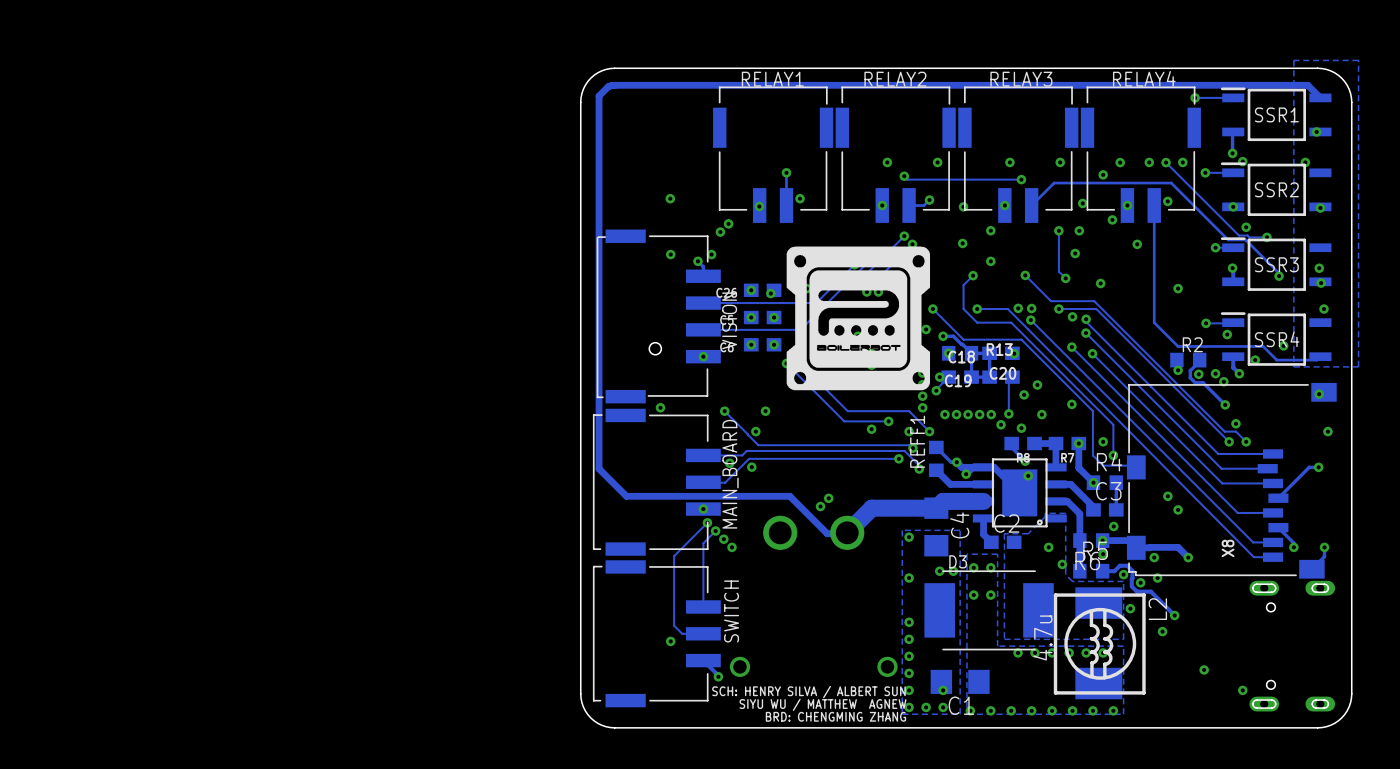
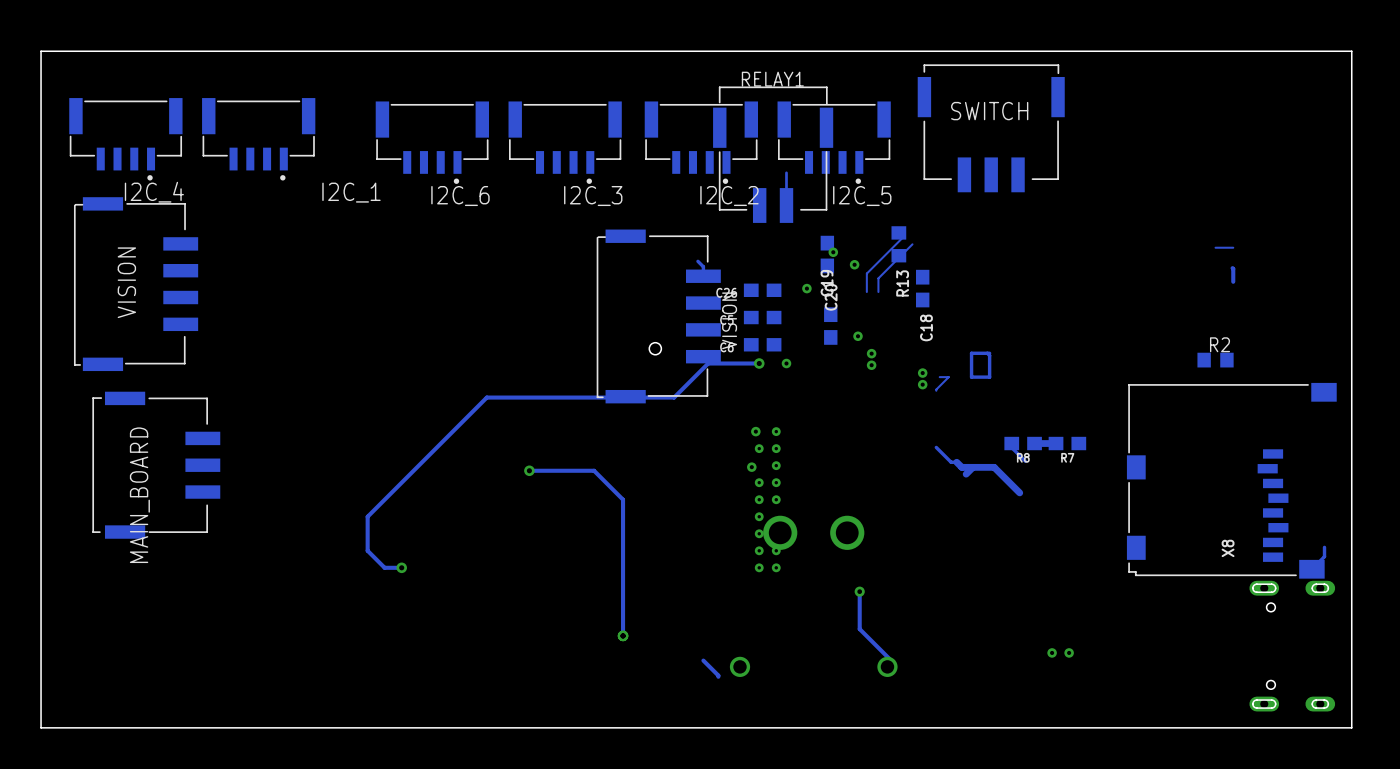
zone outline: (1358, 60) (1358, 366) (1293, 366) (1293, 60) (1358, 60) -> none
via: (1195, 97) -> none
track: (1233, 97) (1195, 97) -> none
track: (1320, 97) (1307, 85) (614, 85) (608, 86) (599, 96) (599, 468) (626, 496) (789, 496) (827, 533) (846, 533) (871, 508) (936, 508) (943, 501) (983, 501) -> none
board edge: (1351, 102) (1349, 89) (1341, 78) (1330, 70) (1317, 68) (614, 68) (605, 69) (594, 75) (583, 89) (580, 102) (580, 693) (583, 706) (590, 717) (601, 725) (614, 727) -> (1351, 102) (1351, 51) (41, 51) (41, 727) (614, 727)
SSR1: (1276, 114) -> none
SWITCH: none -> (991, 128)
track: (1233, 131) (1232, 153) -> none
via: (1316, 131) -> none
I2C_4: none -> (125, 139)
I2C_1: none -> (258, 139)
I2C_6: none -> (432, 142)
I2C_3: none -> (565, 142)
I2C_2: none -> (701, 142)
I2C_5: none -> (834, 142)
via: (1232, 153) -> none
RELAY2: (895, 154) -> none
RELAY3: (1018, 154) -> none
RELAY4: (1140, 154) -> none
via: (1242, 161) -> none
via: (887, 162) -> none
via: (937, 162) -> none
via: (1009, 162) -> none
via: (1060, 162) -> none
via: (1120, 162) -> none
via: (1149, 162) -> none
track: (1166, 162) (1238, 235) (1266, 237) -> none
via: (1166, 162) -> none
via: (1182, 162) -> none
via: (1305, 162) -> none
via: (786, 172) -> none
via: (1205, 172) -> none
track: (1233, 172) (1205, 172) -> none
via: (1103, 174) -> none
track: (904, 176) (907, 179) (1021, 179) -> none
via: (904, 176) -> none
via: (1021, 179) -> none
SSR2: (1276, 189) -> none
via: (670, 198) -> none
via: (800, 198) -> none
track: (929, 200) (924, 205) (909, 205) -> none
via: (929, 200) -> none
via: (1167, 201) -> none
via: (1082, 203) -> none
via: (882, 205) -> none
via: (1004, 205) -> none
track: (1031, 205) (1054, 183) (1171, 183) (1228, 239) (1245, 239) (1279, 273) (1279, 276) -> none
via: (1127, 205) -> none
track: (1154, 205) (1154, 322) (1178, 346) (1263, 346) (1276, 360) (1317, 360) (1320, 356) -> none
via: (759, 206) -> none
via: (963, 206) -> none
via: (1233, 206) -> none
via: (1320, 208) -> none
via: (1112, 219) -> none
via: (728, 223) -> none
via: (1246, 227) -> none
via: (990, 230) -> none
track: (1058, 230) (1058, 271) (1065, 278) -> none
via: (1058, 230) -> none
via: (1079, 230) -> none
via: (720, 232) -> none
via: (904, 236) -> none
via: (1266, 237) -> none
via: (962, 243) -> none
via: (912, 244) -> none
via: (1137, 244) -> none
drawing: [786, 246, 931, 391] -> none
via: (1215, 247) -> none
via: (1075, 253) -> none
via: (670, 254) -> none
via: (711, 254) -> none
track: (871, 256) (871, 258) (800, 329) (703, 329) -> none
via: (697, 261) -> none
via: (990, 261) -> none
track: (854, 264) (816, 303) (703, 303) -> none
SSR3: (1276, 264) -> none
via: (1232, 268) -> none
via: (1319, 268) -> none
track: (973, 275) (963, 285) (963, 309) (977, 322) (1011, 322) (1113, 424) (1113, 455) -> none
via: (973, 275) -> none
track: (1025, 275) (1051, 301) (1094, 301) (1224, 431) (1235, 431) (1246, 441) -> none
via: (1025, 275) -> none
via: (1279, 276) -> none
via: (1065, 278) -> none
via: (1100, 283) -> none
via: (1321, 283) -> none
VISION: none -> (136, 284)
via: (1178, 288) -> none
via: (751, 290) -> none
via: (866, 291) -> none
via: (878, 291) -> none
via: (770, 293) -> none
via: (1018, 308) -> none
via: (1031, 308) -> none
track: (932, 309) (963, 339) (1021, 339) (1092, 411) (1092, 455) (1103, 465) (1134, 465) (1136, 467) -> none
via: (932, 309) -> none
track: (977, 309) (1007, 309) (1253, 557) (1273, 557) -> none
via: (977, 309) -> none
track: (1058, 309) (1096, 309) (1229, 441) -> none
via: (1058, 309) -> none
via: (1323, 309) -> none
via: (1072, 316) -> none
via: (751, 317) -> none
via: (774, 317) -> none
track: (1086, 319) (1086, 321) (1218, 453) (1273, 453) -> none
via: (1086, 319) -> none
track: (1030, 320) (1253, 542) (1273, 542) -> none
via: (1030, 320) -> none
track: (1233, 322) (1206, 323) -> none
via: (1206, 323) -> none
via: (926, 329) -> none
track: (1085, 333) (1221, 468) (1267, 468) -> none
via: (1085, 333) -> none
via: (1227, 334) -> none
track: (943, 336) (953, 336) (971, 353) -> none
via: (943, 336) -> none
SSR4: (1276, 339) -> none
via: (751, 344) -> none
via: (774, 344) -> none
via: (1283, 345) -> none
track: (1071, 347) (1237, 512) (1273, 512) -> none
via: (1071, 347) -> none
via: (948, 353) -> none
R13 rotation: 0° (960, 353) -> 90° clockwise (898, 244)
R13 position: (960, 353) -> (898, 244)
C18 rotation: 0° (1001, 353) -> 90° clockwise (922, 288)
C18 position: (1001, 353) -> (922, 288)
via: (1014, 353) -> none
track: (1092, 353) (1222, 483) (1273, 483) -> none
via: (1092, 353) -> none
via: (703, 356) -> none
track: (1233, 356) (1233, 367) (1239, 373) -> none
C18 name position: C18 (961, 357) -> C18 (926, 327)
R2 position: (1188, 360) -> (1215, 360)
track: (1199, 360) (1190, 370) (1190, 377) (1195, 382) (1203, 382) (1225, 404) -> none
via: (1255, 360) -> none
track: none -> (759, 363) (708, 363) (674, 397) (486, 397) (367, 516) (367, 550) (384, 567) (401, 567)
via: none -> (759, 363)
track: (786, 363) (844, 421) (888, 421) -> none
track: (800, 363) (847, 411) (909, 411) (929, 431) -> none
via: (1178, 370) -> none
via: (1215, 373) -> none
via: (1239, 373) -> none
via: (1198, 374) -> none
via: (939, 377) -> none
C20 rotation: 0° (960, 377) -> 90° clockwise (827, 254)
C20 position: (960, 377) -> (827, 254)
C19 rotation: 0° (1001, 377) -> 90° clockwise (830, 326)
C19 position: (1001, 377) -> (830, 326)
track: (1012, 377) (1008, 380) (1008, 413) -> none
via: (1223, 381) -> none
via: (1037, 385) -> none
via: (936, 390) -> none
via: (1024, 394) -> none
via: (1319, 394) -> none
via: (922, 396) -> none
via: (1071, 404) -> none
via: (1225, 404) -> none
via: (660, 407) -> none
via: (922, 407) -> none
track: (724, 411) (758, 445) (909, 445) (912, 448) -> none
via: (724, 411) -> none
via: (765, 411) -> none
via: (1008, 413) -> none
via: (944, 414) -> none
via: (956, 414) -> none
via: (968, 414) -> none
via: (979, 414) -> none
via: (991, 414) -> none
via: (1041, 414) -> none
via: (888, 421) -> none
via: (1235, 423) -> none
via: (1001, 424) -> none
via: (1021, 428) -> none
via: (871, 429) -> none
via: none -> (776, 431)
via: (909, 431) -> none
via: (929, 431) -> none
via: (1327, 431) -> none
via: (1103, 441) -> none
via: (1229, 441) -> none
via: (1246, 441) -> none
track: (1055, 443) (1055, 467) -> none
track: (1078, 443) (1078, 468) (1093, 482) -> none
via: (1078, 443) -> none
via: none -> (759, 448)
via: none -> (776, 448)
via: (912, 448) -> none
track: (703, 455) (742, 455) (746, 451) (904, 451) (919, 465) (919, 469) -> none
via: (1113, 455) -> none
track: (898, 458) (749, 458) (725, 482) (703, 482) -> none
via: (898, 458) -> none
REFF1: (936, 458) -> none
via: (1025, 461) -> none
via: (956, 462) -> none
via: (729, 463) -> none
MAIN_BOARD: none -> (156, 465)
via: none -> (776, 465)
track: (1318, 467) (1309, 467) (1278, 498) -> none
via: (1318, 467) -> none
via: (919, 469) -> none
track: none -> (529, 470) (594, 470) (623, 499) (623, 635)
via: none -> (529, 470)
track: (936, 470) (950, 484) (983, 484) -> none
via: (966, 474) -> none
via: (1028, 475) -> none
MAIN_BOARD: (656, 482) -> none
via: none -> (759, 482)
via: none -> (776, 482)
via: (1093, 482) -> none
R4: (1104, 482) -> none
track: (1116, 482) (1116, 509) -> none
track: (1055, 484) (1070, 484) (1093, 507) (1093, 509) -> none
part: (1019, 492) -> none
via: (1167, 496) -> none
via: (828, 498) -> none
via: none -> (759, 499)
via: none -> (776, 499)
track: (1055, 501) (1067, 501) (1079, 513) (1079, 571) -> none
via: (820, 506) -> none
via: (703, 509) -> none
C3: (1104, 509) -> none
via: (1178, 509) -> none
zone outline: (1065, 513) (1065, 574) (1072, 581) (1123, 581) (1123, 639) (1004, 639) (1004, 533) (1028, 533) (1045, 516) (1045, 513) (1065, 513) -> none
via: none -> (759, 516)
track: (983, 518) (983, 534) (991, 542) -> none
track: (707, 522) (674, 556) (674, 625) (682, 633) (703, 633) -> none
via: (707, 522) -> none
C4: (936, 526) -> none
via: (1113, 526) -> none
track: (1278, 527) (1293, 543) (1293, 547) -> none
zone outline: (960, 530) (902, 530) (902, 714) (960, 714) (960, 530) -> none
track: (715, 531) (703, 543) (703, 606) -> none
via: (715, 531) -> none
via: none -> (759, 533)
via: (909, 537) -> none
via: (723, 539) -> none
R6: (1091, 540) -> none
via: (1102, 540) -> none
C2: (1002, 542) -> none
via: (732, 547) -> none
via: (1048, 547) -> none
via: (1293, 547) -> none
via: (1324, 547) -> none
via: none -> (759, 550)
via: none -> (776, 550)
zone outline: (997, 554) (997, 646) (1123, 646) (1123, 714) (966, 714) (966, 554) (997, 554) -> none
track: (1103, 554) (1102, 540) (1129, 540) (1136, 547) (1178, 547) (1188, 557) -> none
via: (1103, 554) -> none
via: (1154, 557) -> none
via: (1188, 557) -> none
via: (1062, 564) -> none
via: none -> (401, 567)
via: none -> (759, 567)
via: none -> (776, 567)
via: (973, 567) -> none
via: (990, 567) -> none
via: (939, 571) -> none
via: (953, 571) -> none
R5: (1091, 571) -> none
track: (1102, 571) (1114, 571) (1119, 565) (1127, 565) (1132, 570) (1131, 586) (1136, 591) (1150, 591) (1174, 615) -> none
via: (1123, 574) -> none
via: (909, 578) -> none
via: (1157, 578) -> none
via: (1140, 582) -> none
track: none -> (859, 591) (859, 629) (890, 659)
via: none -> (859, 591)
via: (973, 595) -> none
via: (990, 595) -> none
via: (1130, 608) -> none
D3: (989, 610) -> none
via: (1174, 615) -> none
via: (909, 622) -> none
via: (1162, 631) -> none
SWITCH: (656, 633) -> none
via: none -> (623, 635)
via: (909, 639) -> none
via: (670, 641) -> none
L2: 4.7u (1099, 643) -> none
via: (1018, 652) -> none
via: (1035, 652) -> none
via: (1086, 652) -> none
via: (1103, 652) -> none
via: (909, 656) -> none
via: (1204, 669) -> none
via: (909, 673) -> none
via: (718, 676) -> none
C1: (960, 681) -> none
via: (909, 690) -> none
via: (943, 690) -> none
via: (1242, 690) -> none
text: SCH: HENRY SILVA / ALBERT SUN (808, 692) -> none
board edge: (1351, 693) (1349, 706) (1341, 717) (1330, 725) (1317, 727) -> (1351, 693) (1351, 727) (1317, 727)
text: SIYU WU / MATTHEW AGNEW (823, 704) -> none
via: (909, 707) -> none
via: (926, 707) -> none
via: (943, 707) -> none
via: (970, 710) -> none
via: (990, 710) -> none
via: (1011, 710) -> none
via: (1031, 710) -> none
via: (1052, 710) -> none
via: (1072, 710) -> none
via: (1092, 710) -> none
via: (1113, 710) -> none
text: BRD: CHENGMING ZHANG (835, 716) -> none

